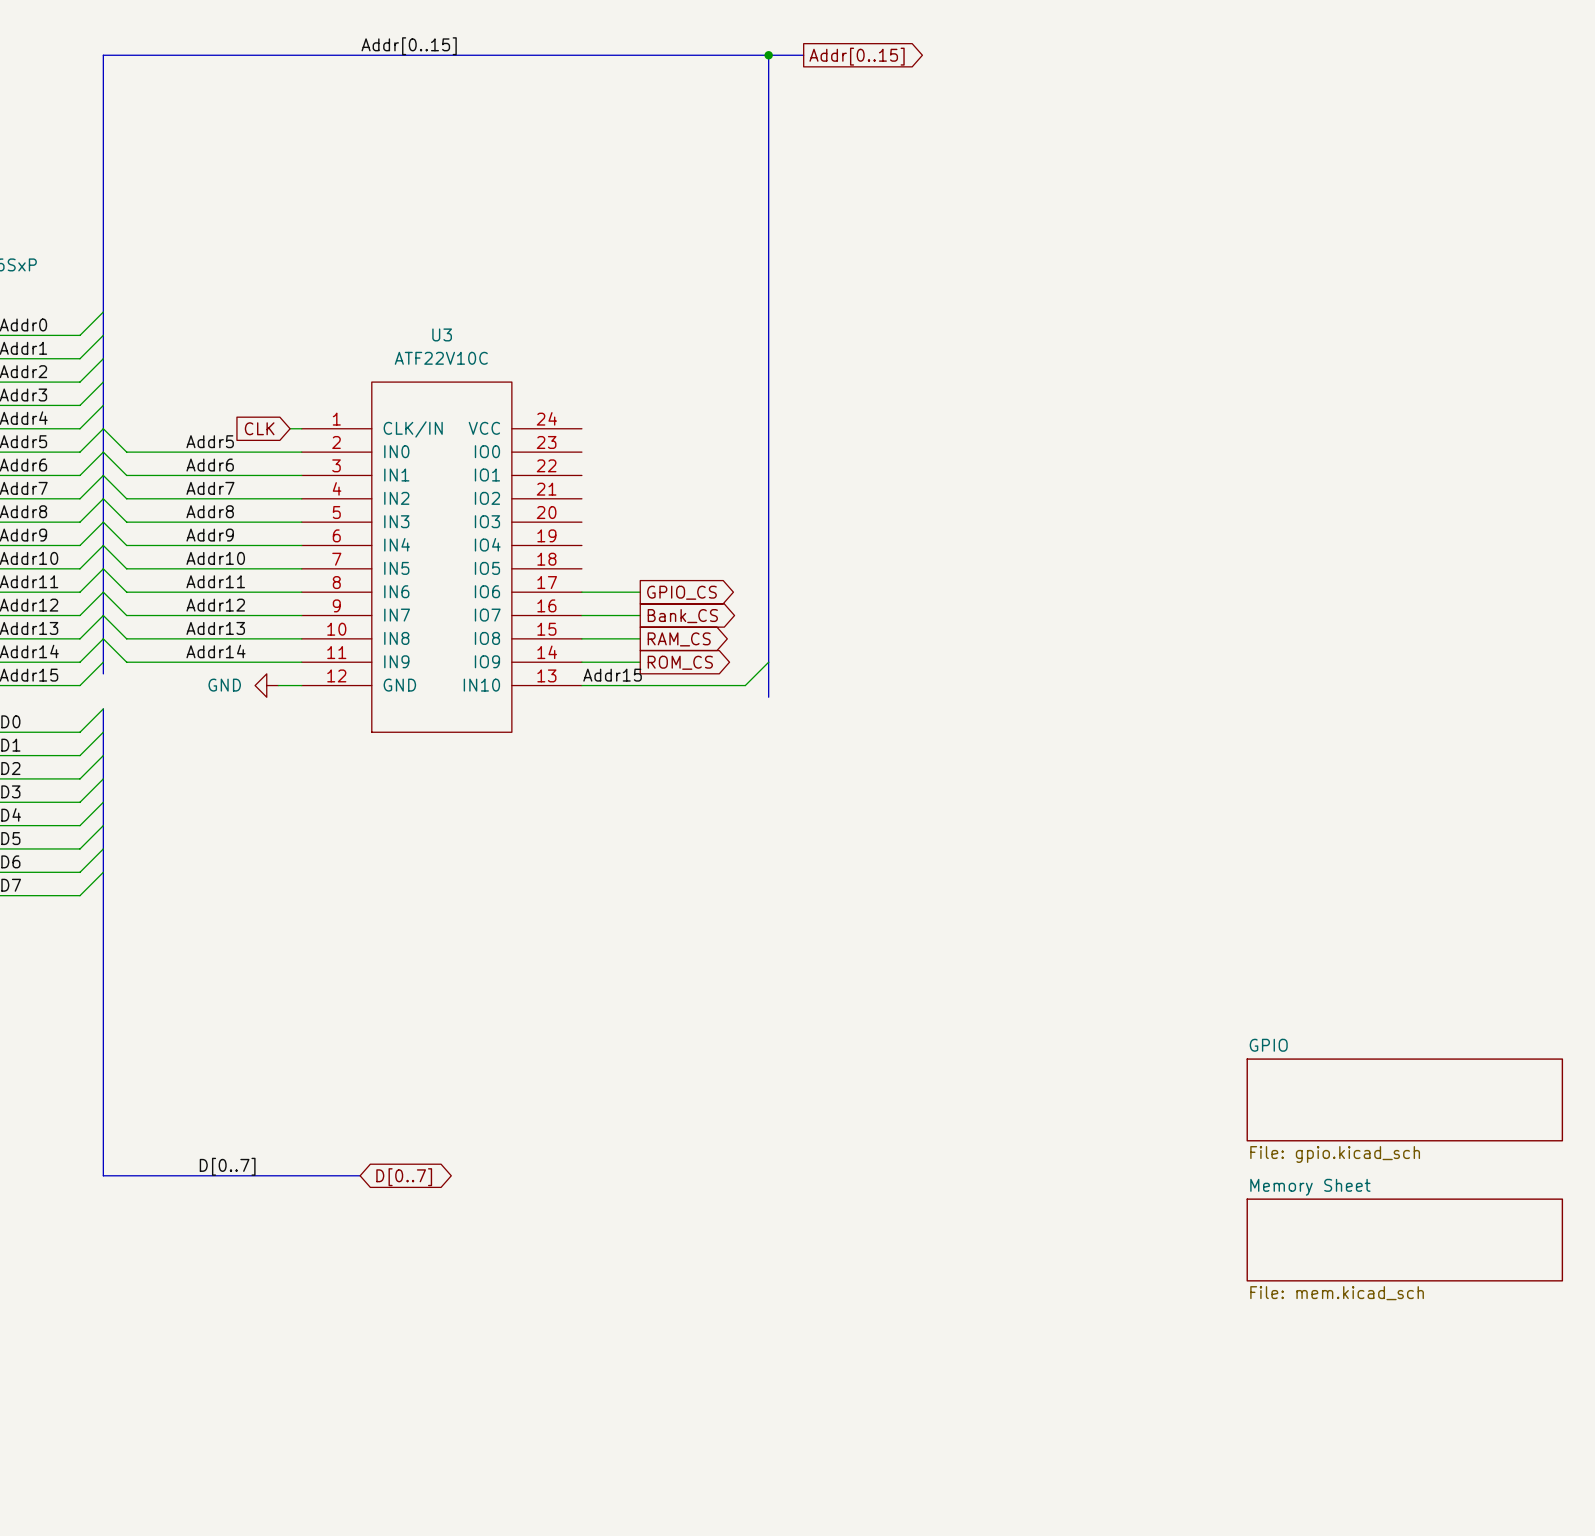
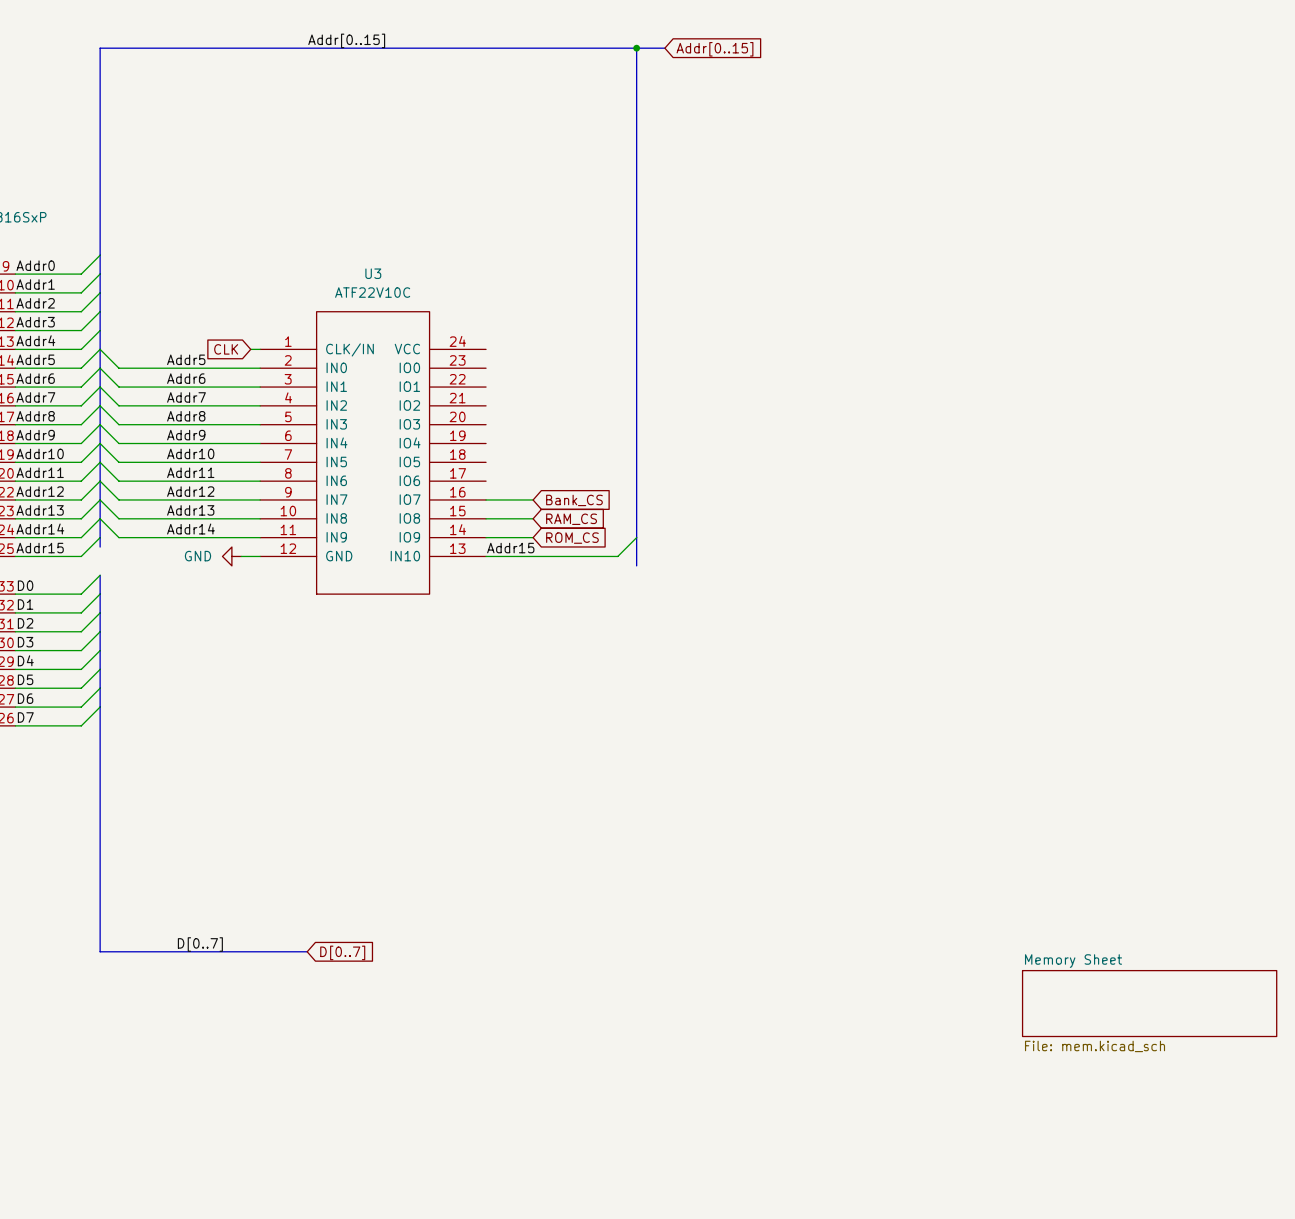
global label shape: output (857, 56) -> input (714, 49)
wire: (581, 592) (640, 592) -> none
global label: GPIO_CS (681, 592) -> none
global label shape: output (682, 616) -> input (574, 500)
global label shape: output (679, 639) -> input (571, 519)
global label shape: output (680, 662) -> input (572, 538)
sheet GPIO: File: gpio.kicad_sch (1404, 1099) -> none
global label shape: bidirectional (404, 1177) -> input (342, 952)

